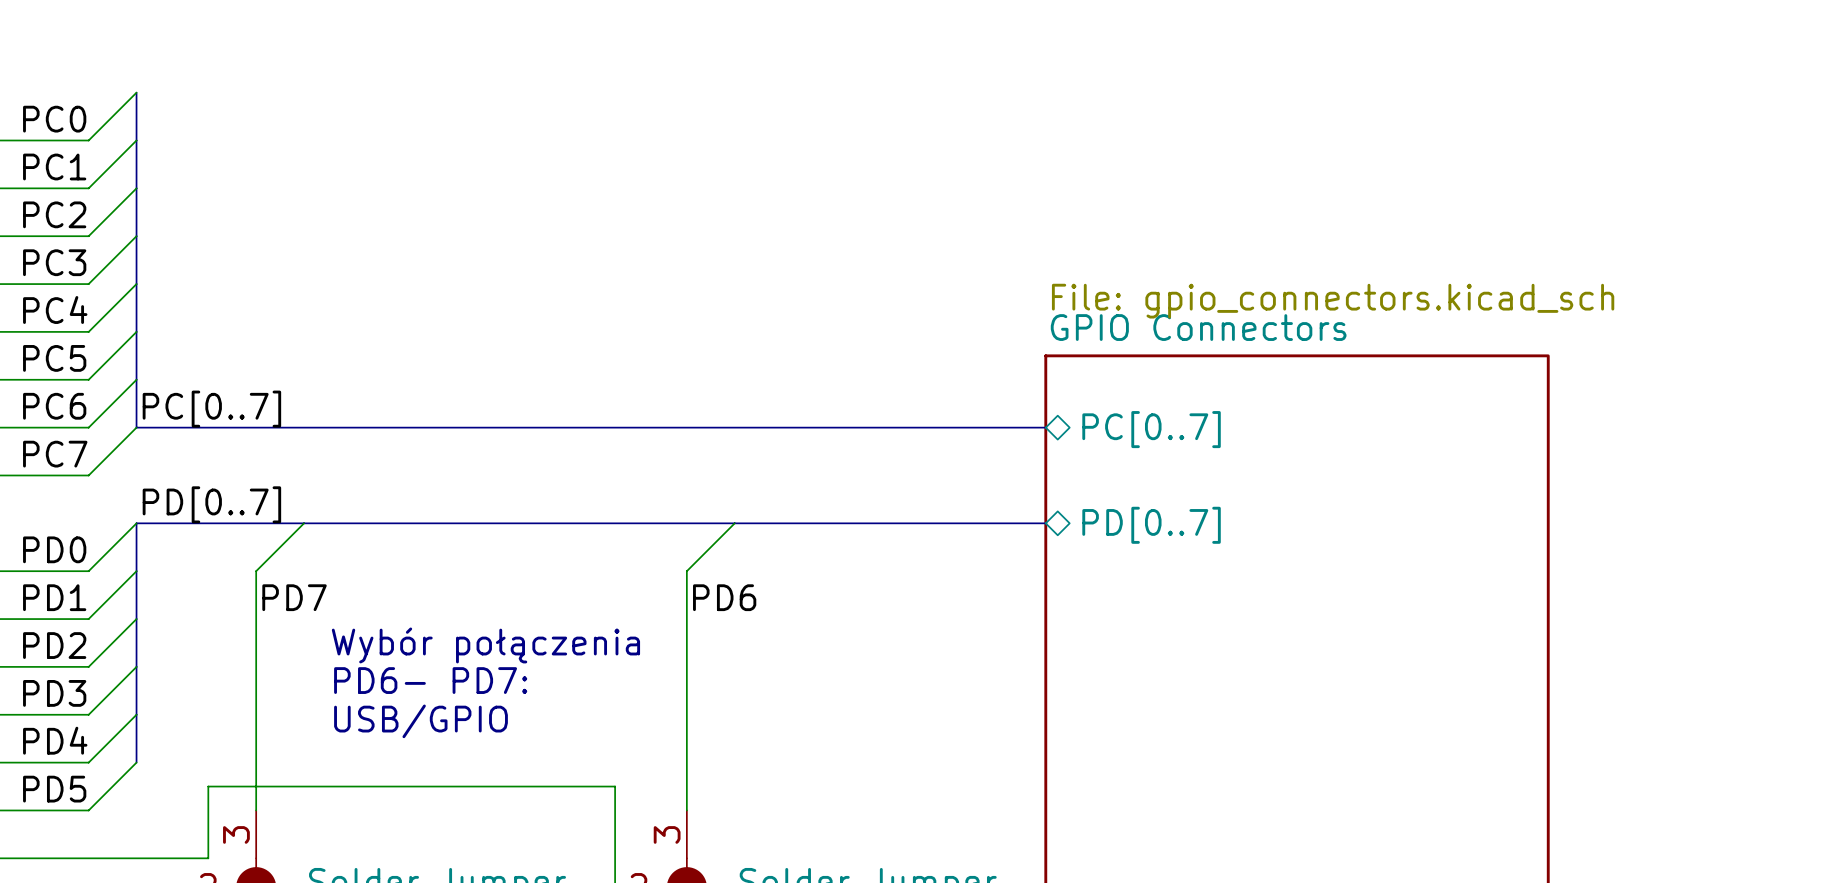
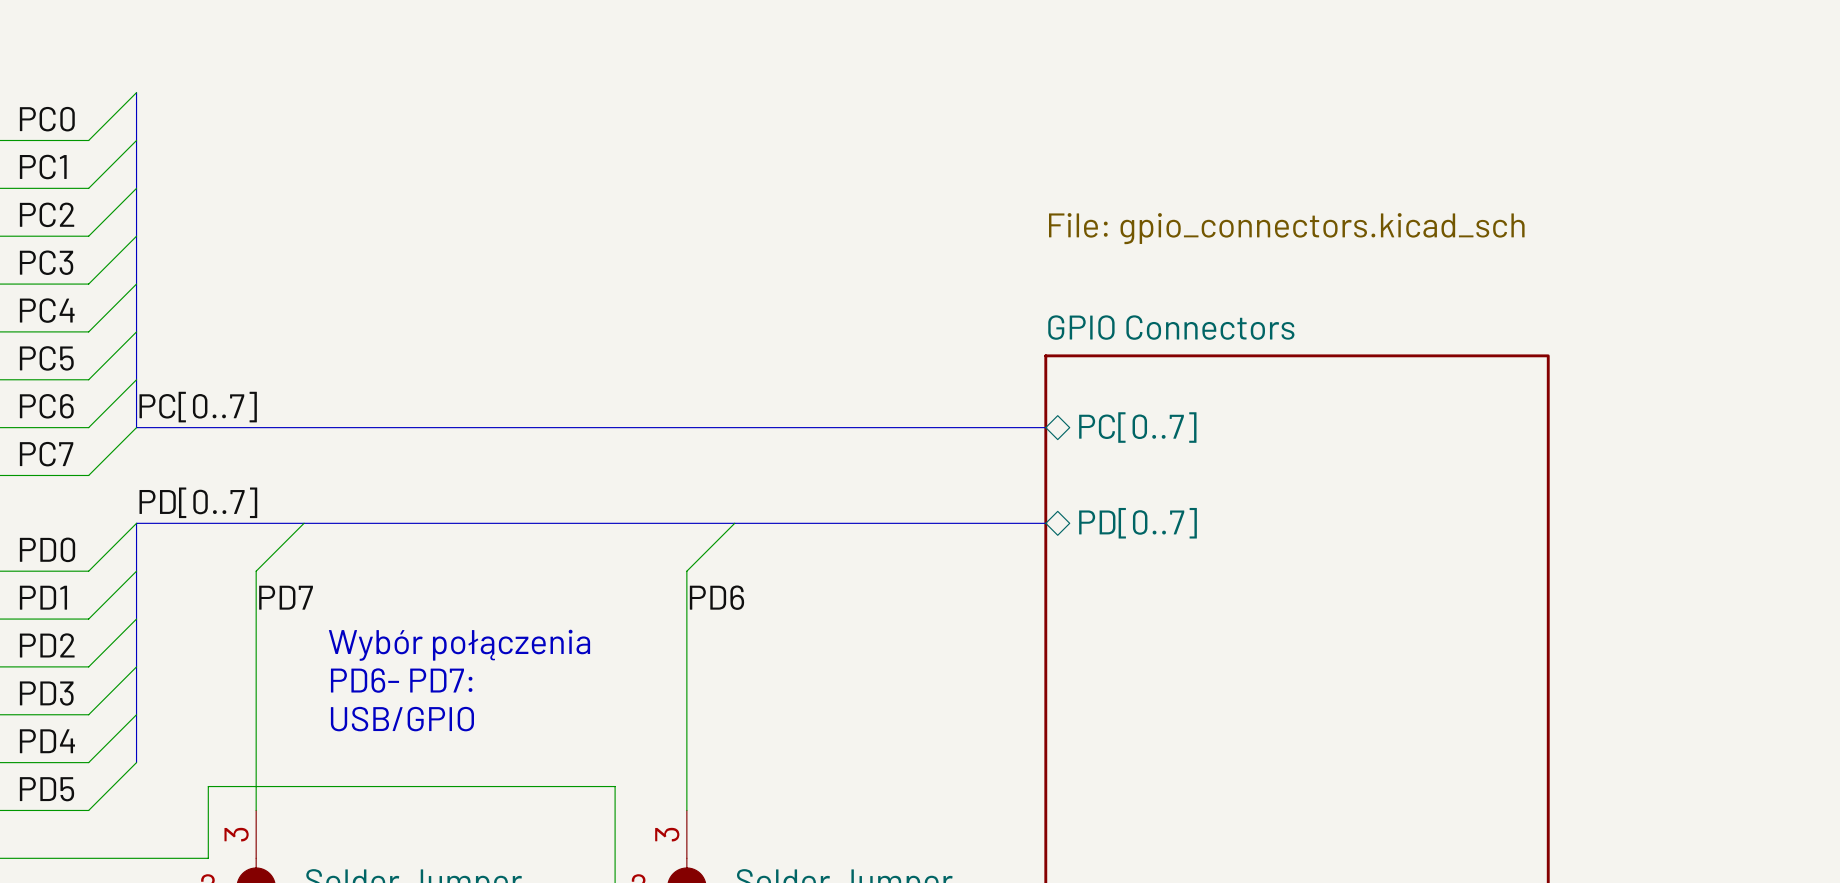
sheet GPIO Connectors value position: File: gpio_connectors.kicad_sch (1333, 301) -> File: gpio_connectors.kicad_sch (1286, 228)

